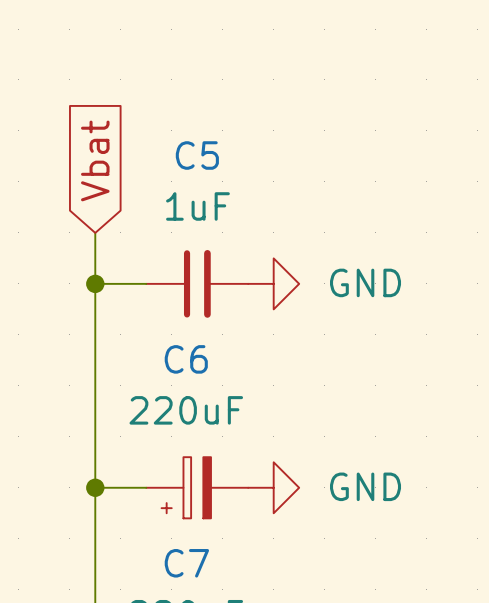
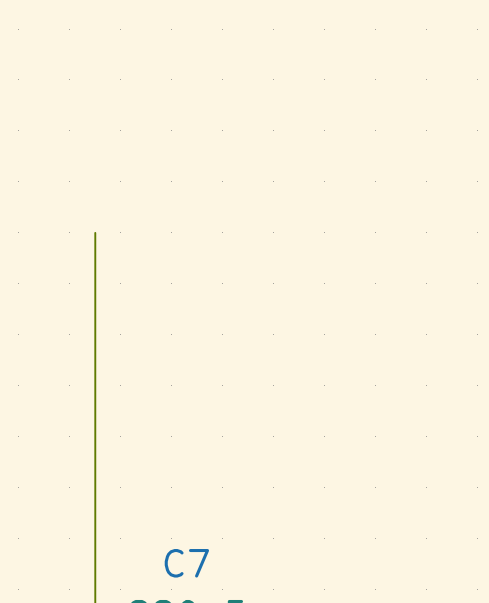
global label: Vbat (95, 160) -> none
wire: (95, 283) (146, 283) -> none
junction: (95, 283) -> none
C5: 1uF (197, 283) -> none
power symbol: GND (273, 283) -> none
wire: (95, 487) (146, 487) -> none
junction: (95, 487) -> none
C6: 220uF (197, 487) -> none
power symbol: GND (273, 487) -> none

